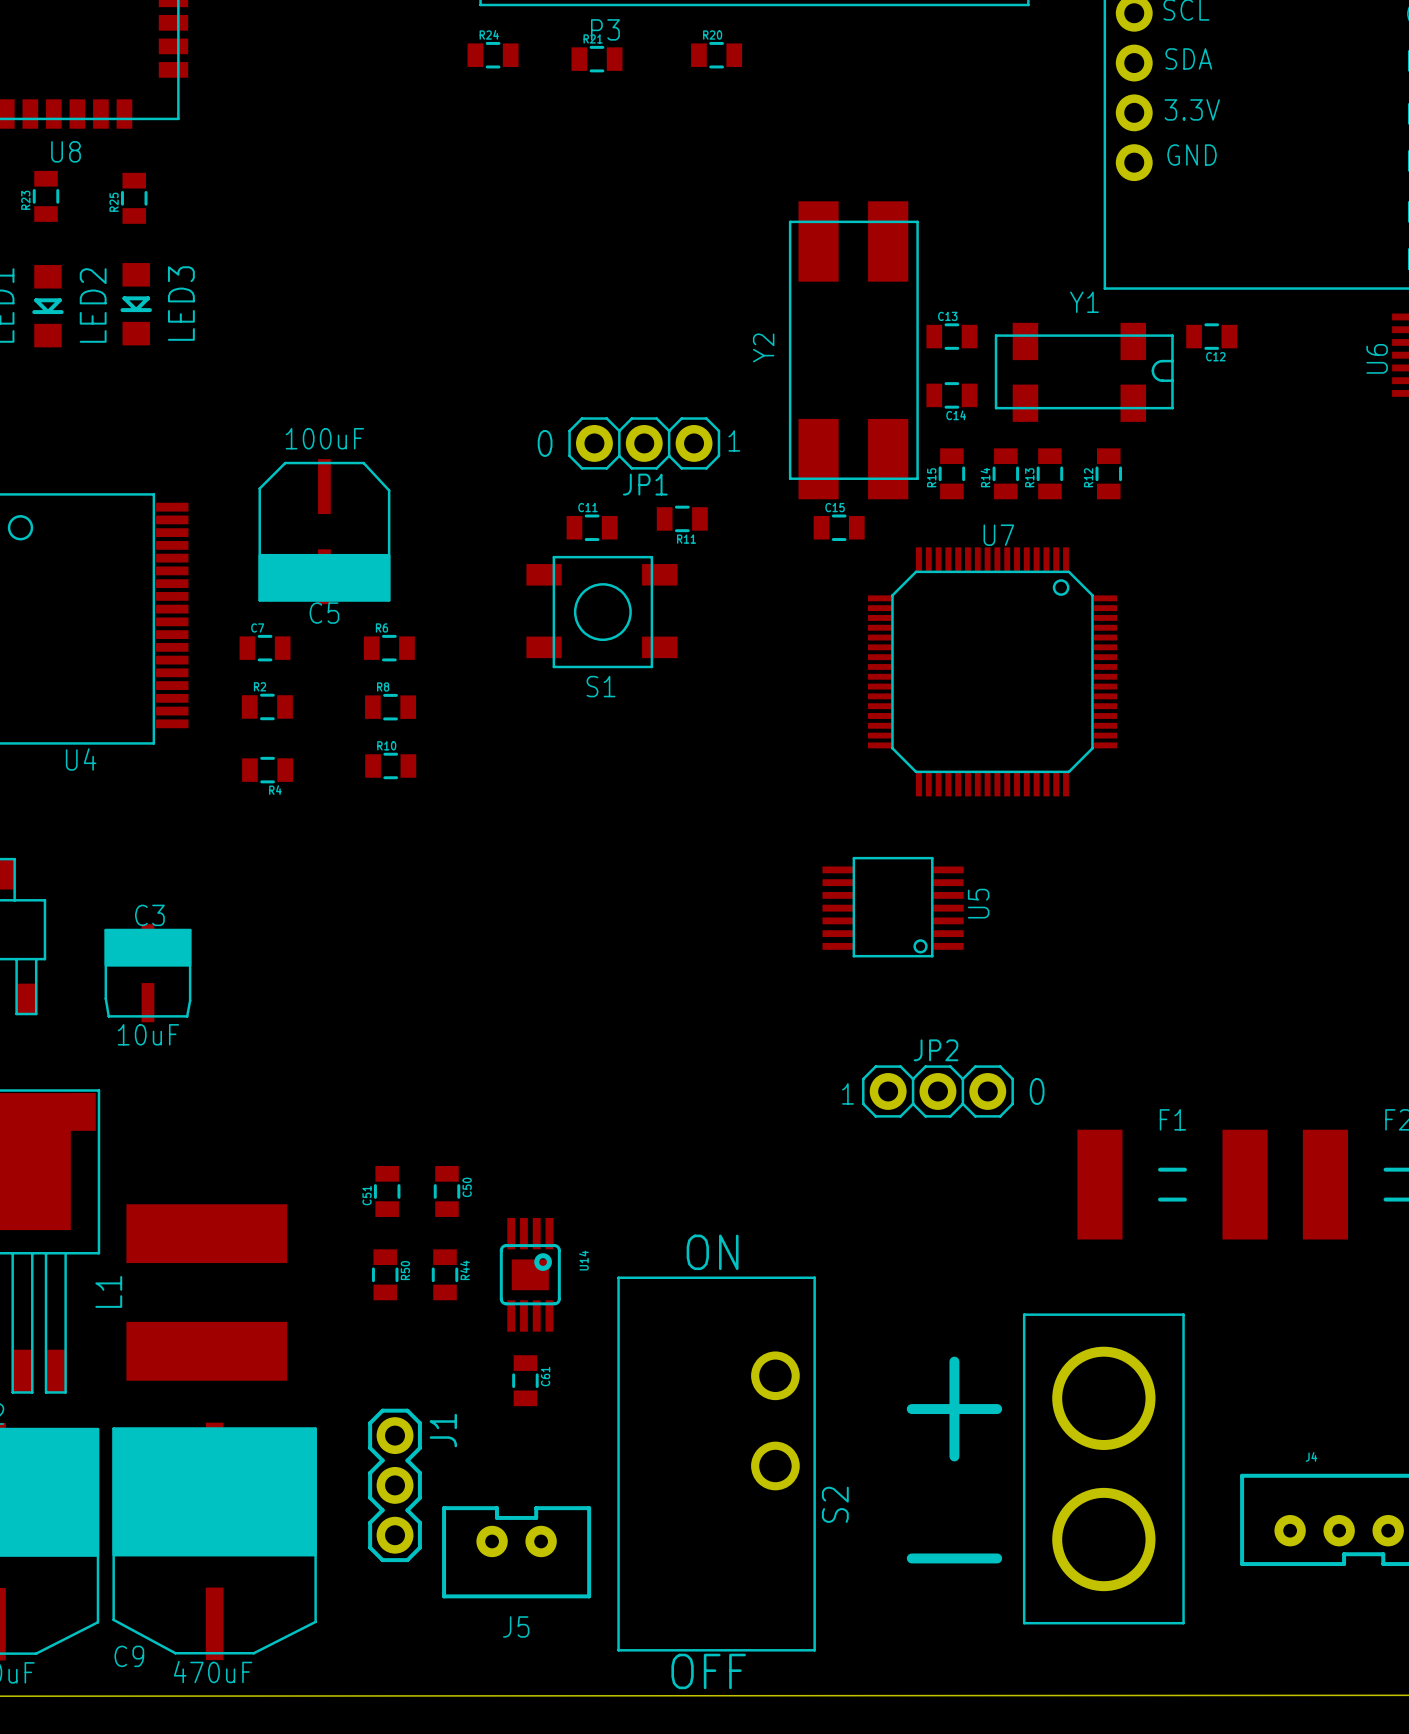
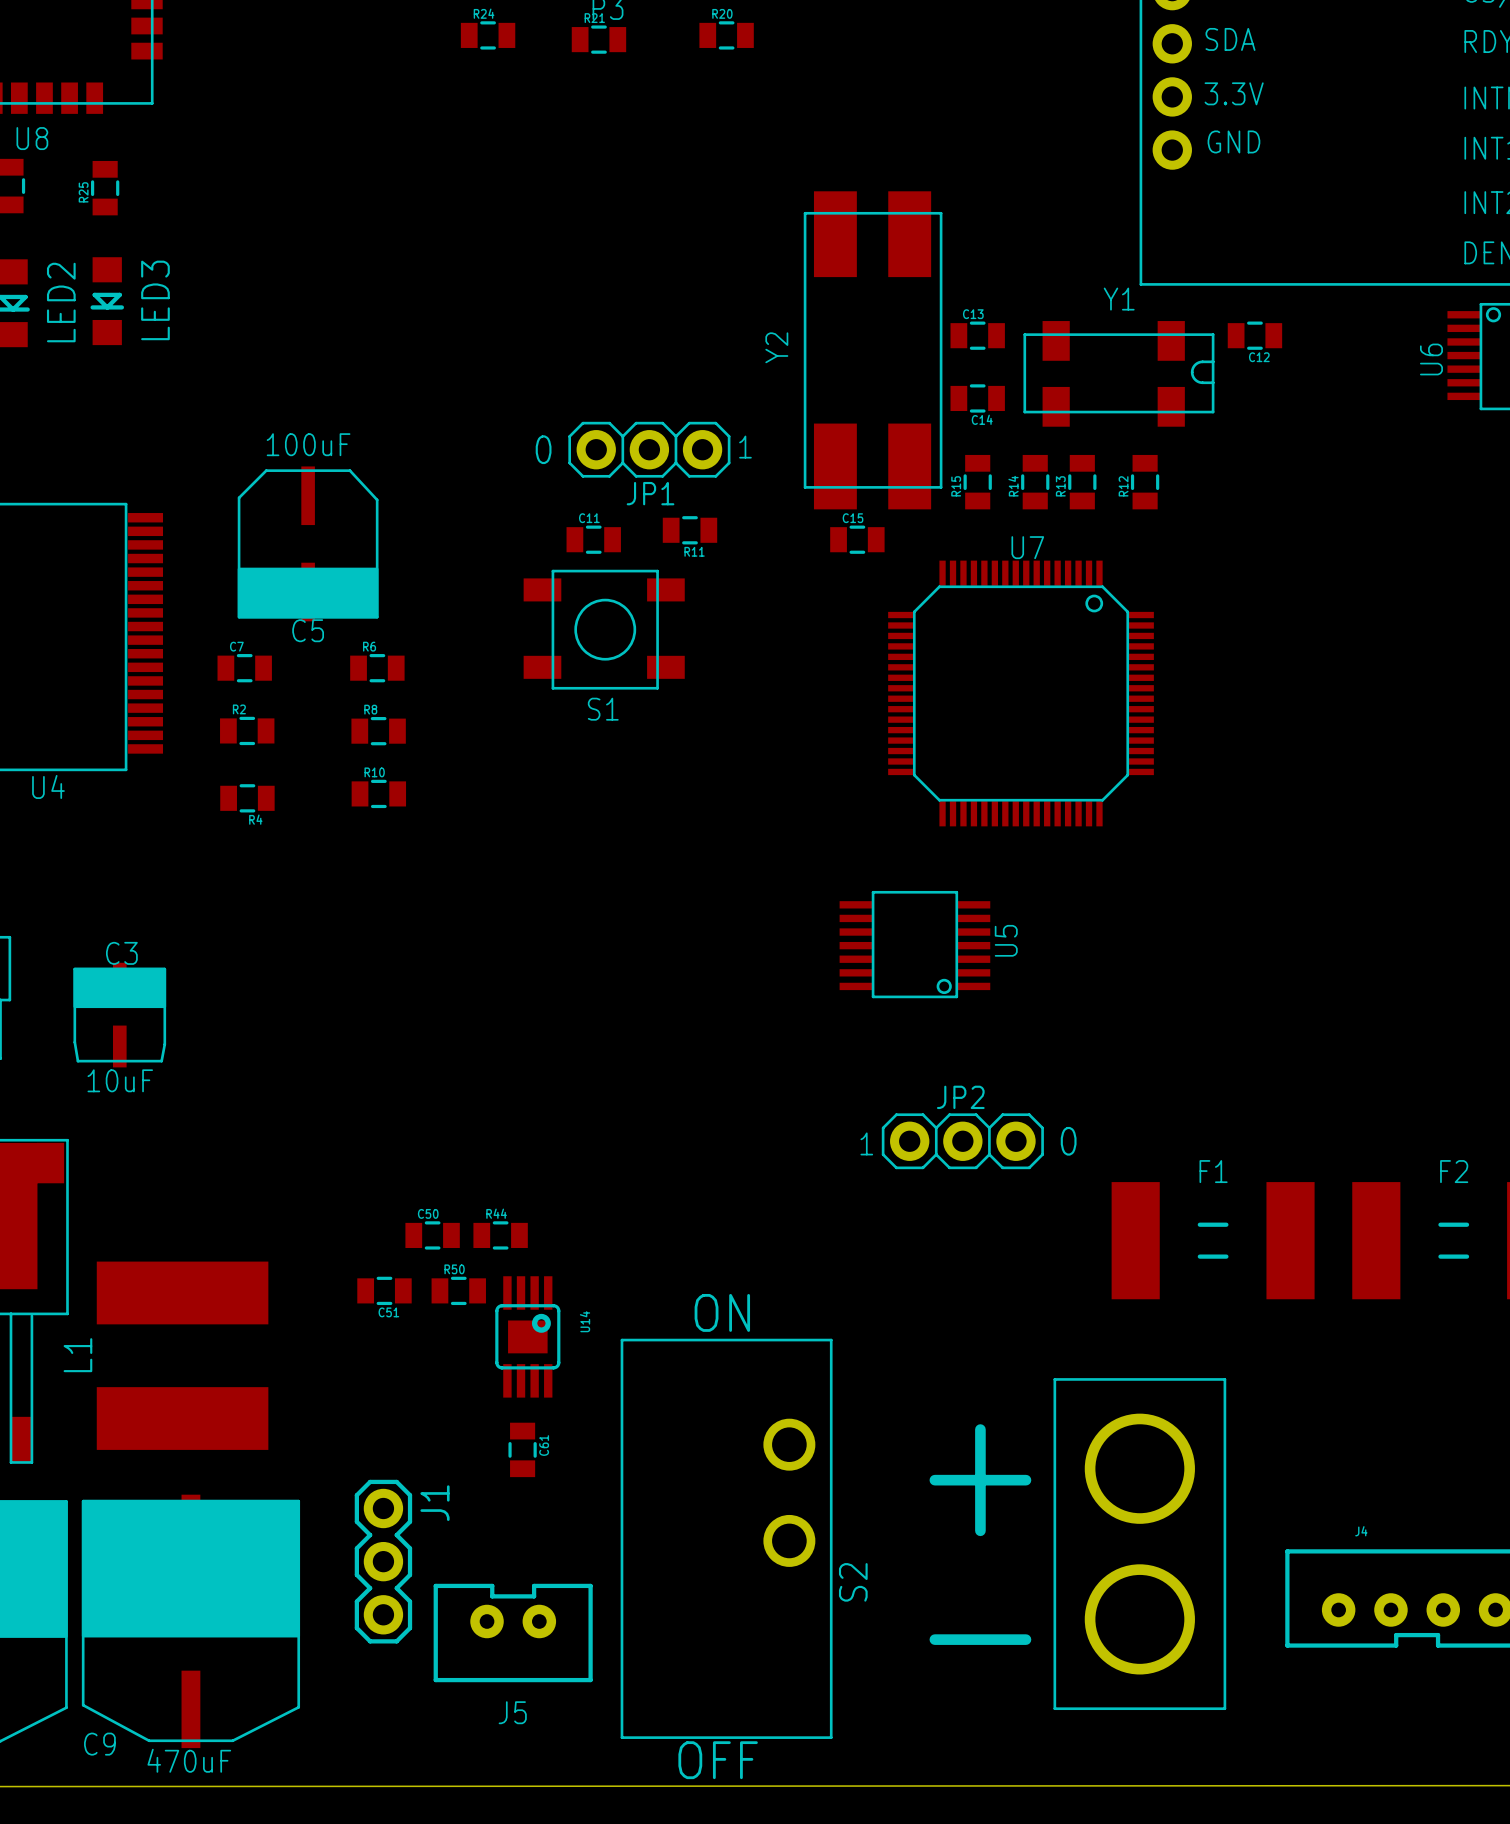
C51 rotation: 0° (387, 1191) -> 90° clockwise (384, 1290)
C51 position: (387, 1191) -> (384, 1290)
C50 rotation: 0° (446, 1191) -> 90° clockwise (432, 1235)
R50 rotation: 0° (385, 1274) -> 90° clockwise (458, 1290)
R50 position: (385, 1274) -> (458, 1290)
R44 rotation: 0° (445, 1274) -> 90° clockwise (500, 1235)
R44 position: (445, 1274) -> (500, 1235)

